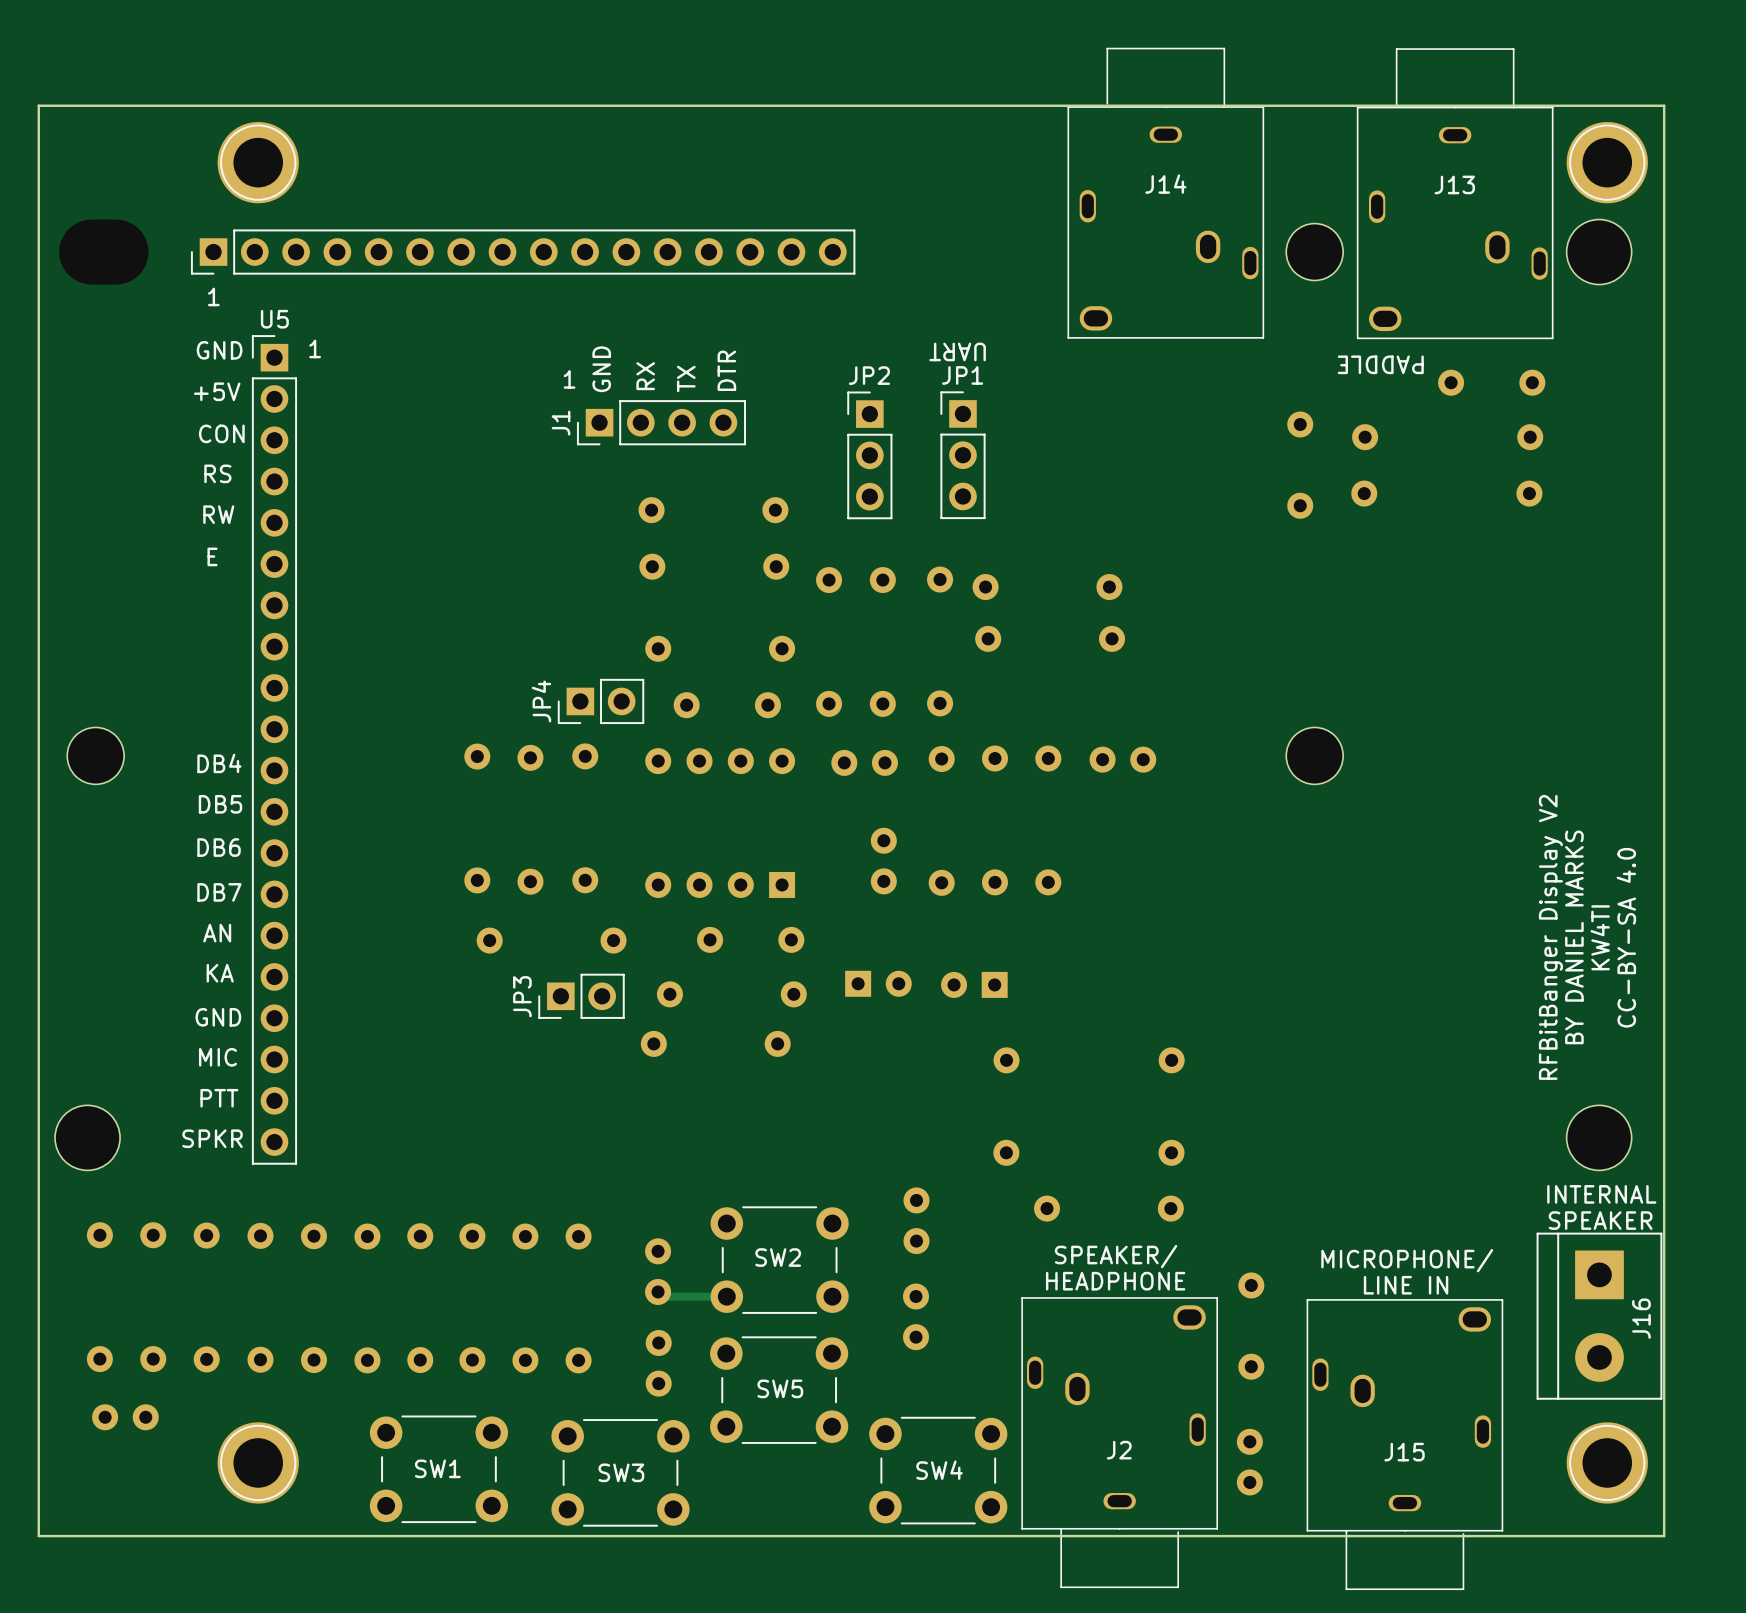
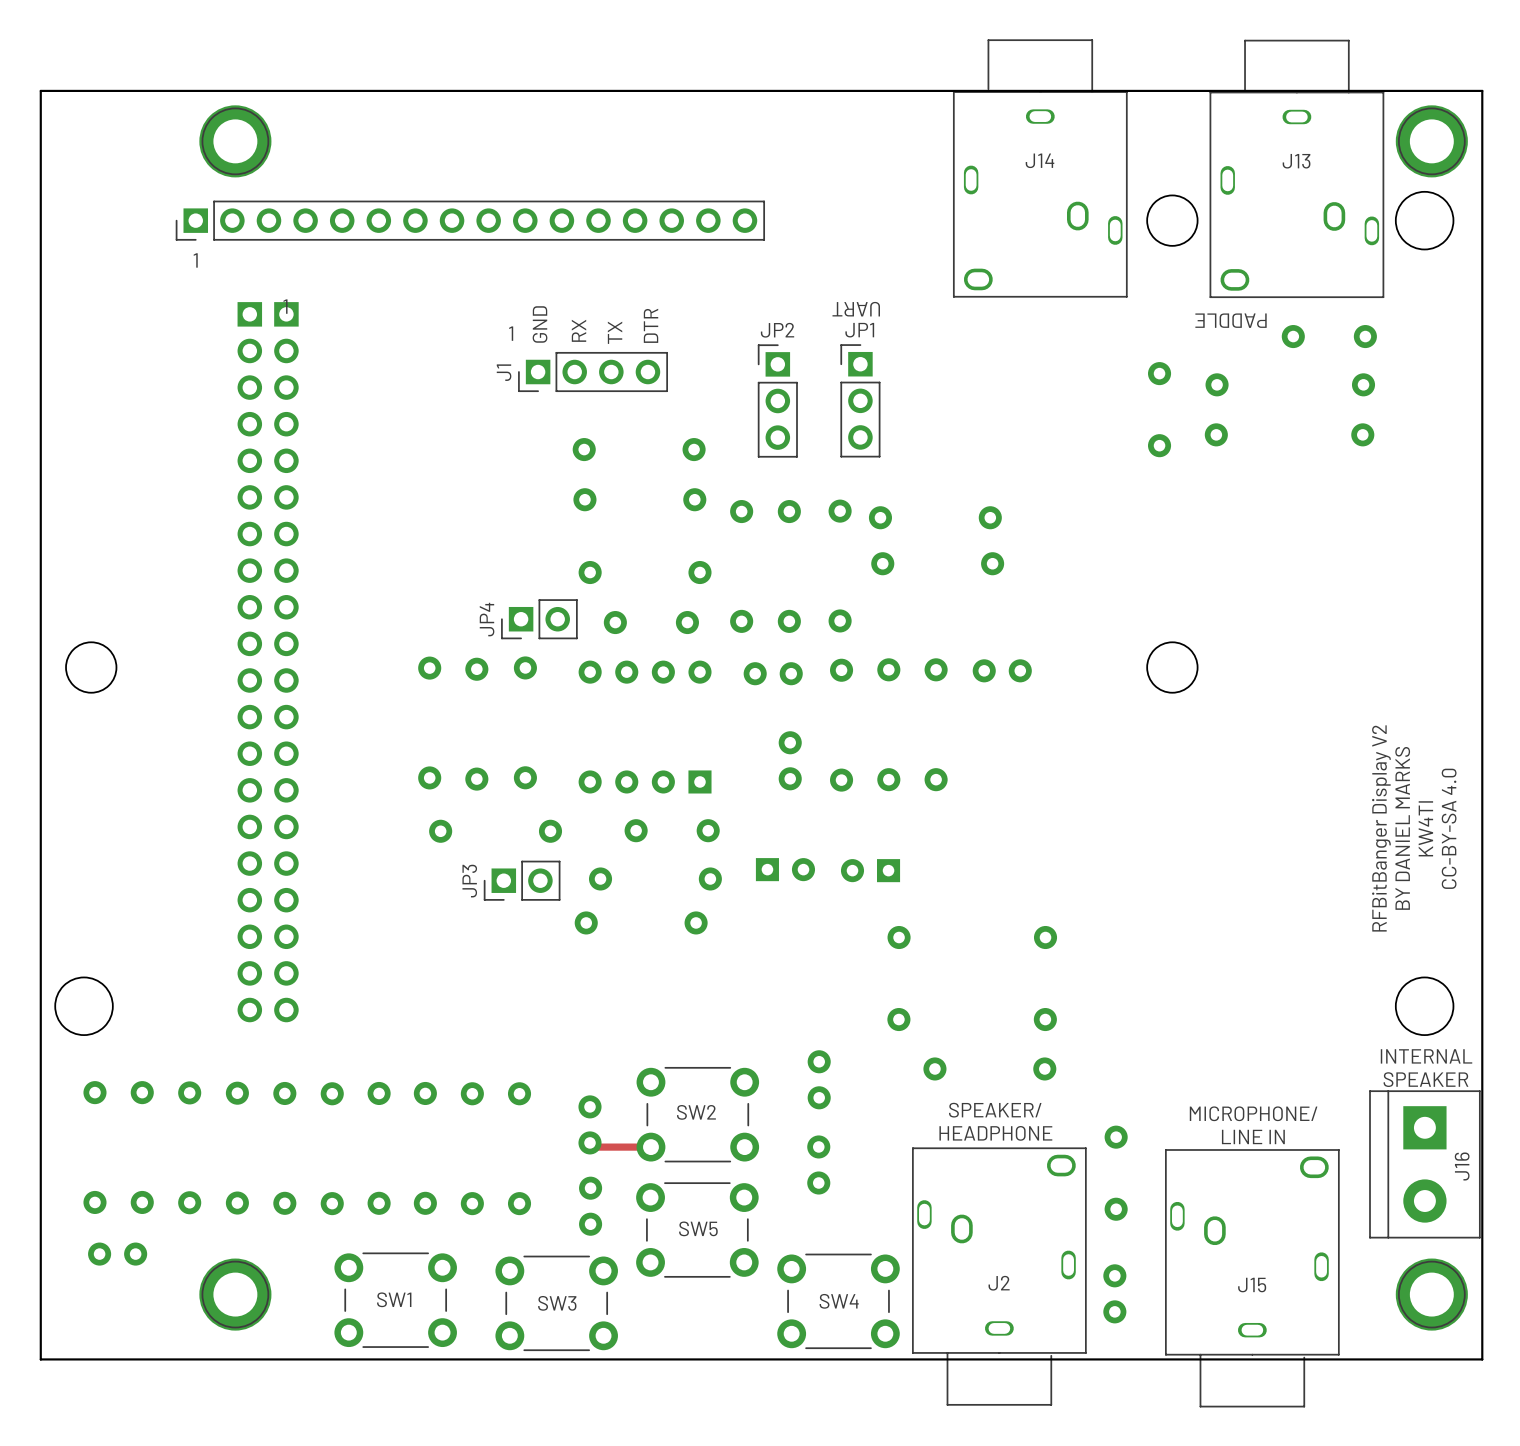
text: GND (219, 350) -> none
text: +5V (217, 391) -> none
text: CON (221, 433) -> none
text: RS (217, 473) -> none
text: RW (218, 514) -> none
text: E (212, 556) -> none
U5 side: top (274, 749) -> bottom (249, 662)
part: none -> (286, 662)
text: DB4 (219, 763) -> none
text: DB5 (220, 804) -> none
text: DB6 (219, 847) -> none
text: DB7 (219, 892) -> none
text: AN (217, 933) -> none
text: KA (220, 973) -> none
text: GND (218, 1017) -> none
text: MIC (217, 1057) -> none
text: PTT (219, 1098) -> none
text: SPKR (212, 1138) -> none

